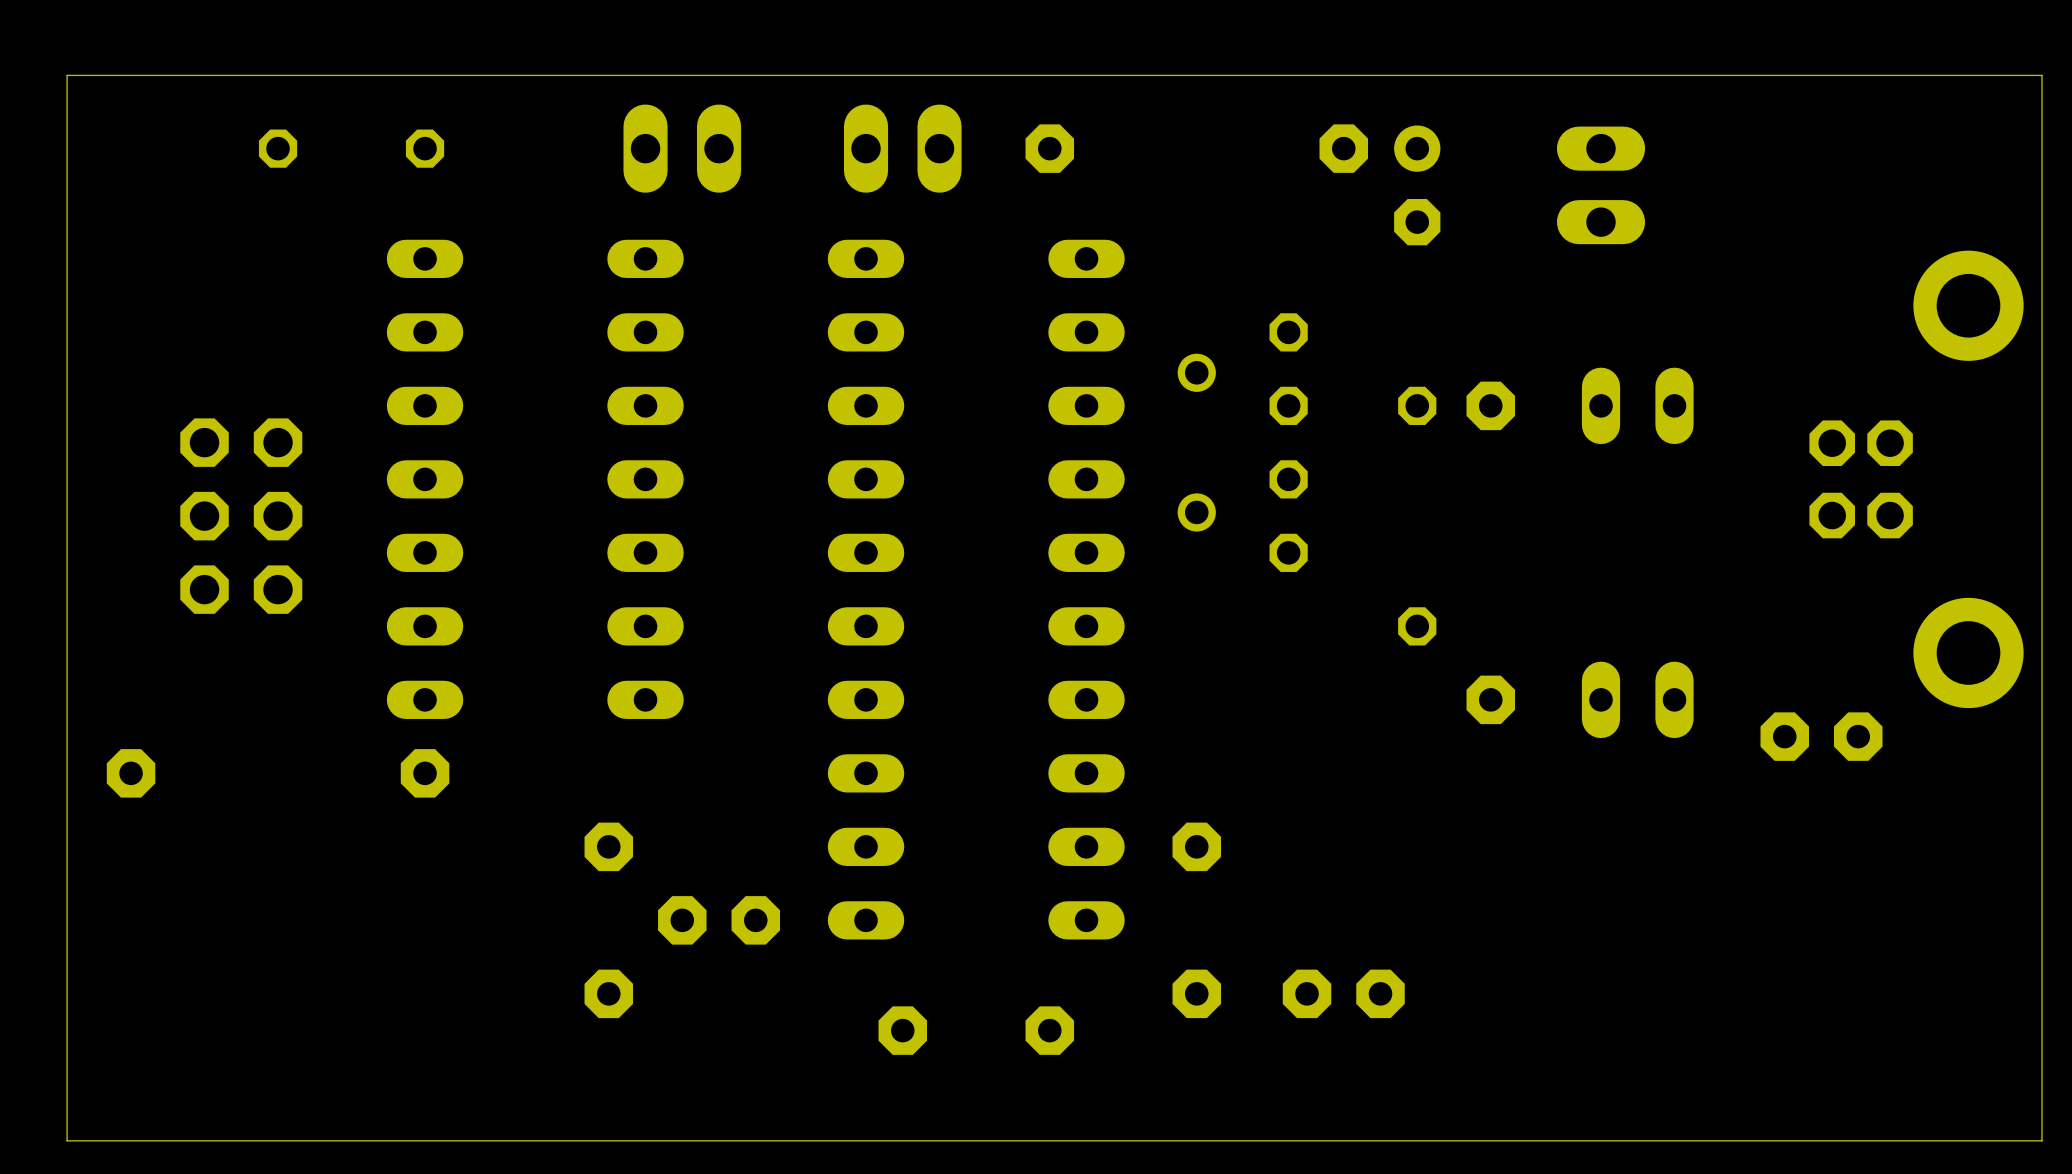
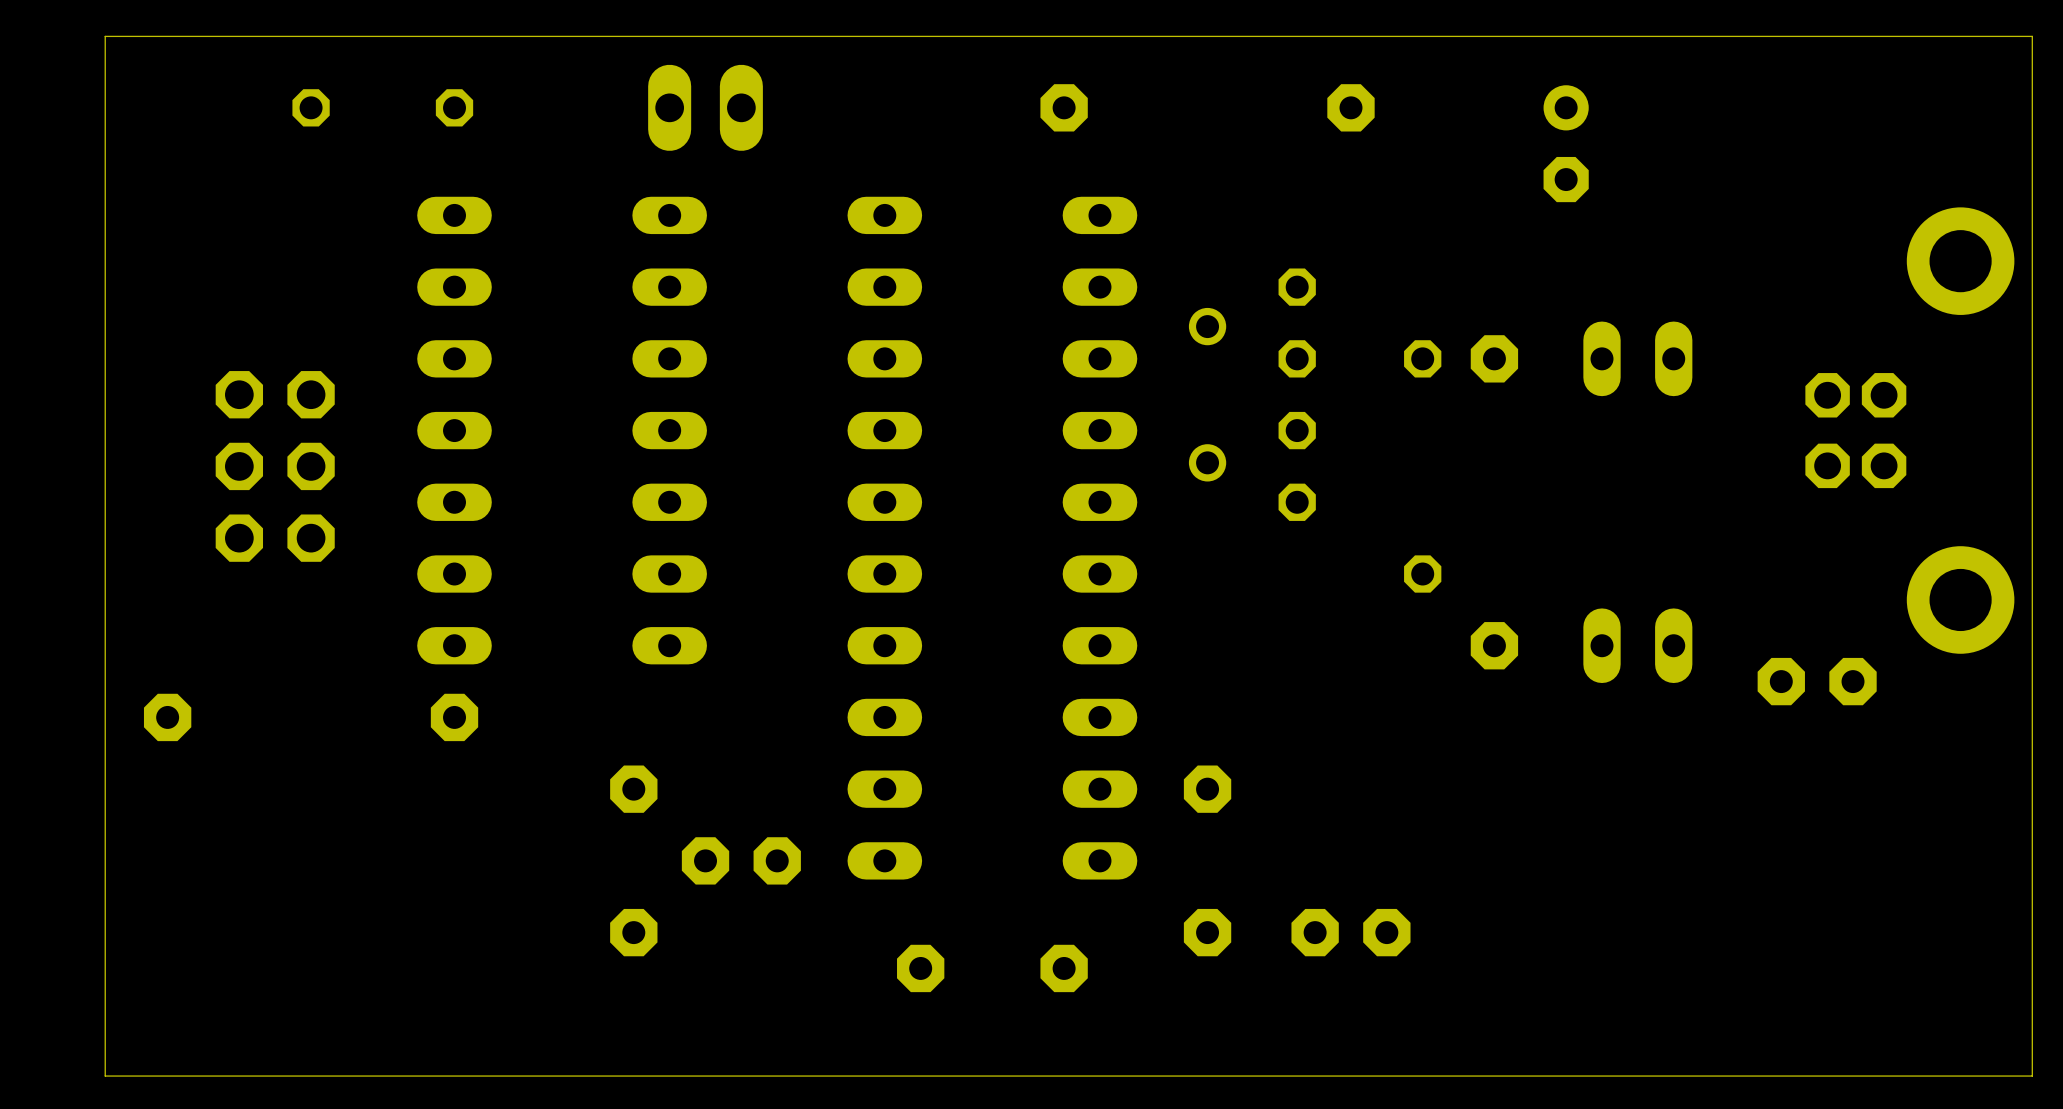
part: (902, 148) -> none
part position: (1417, 185) -> (1566, 143)
part: (1601, 185) -> none

